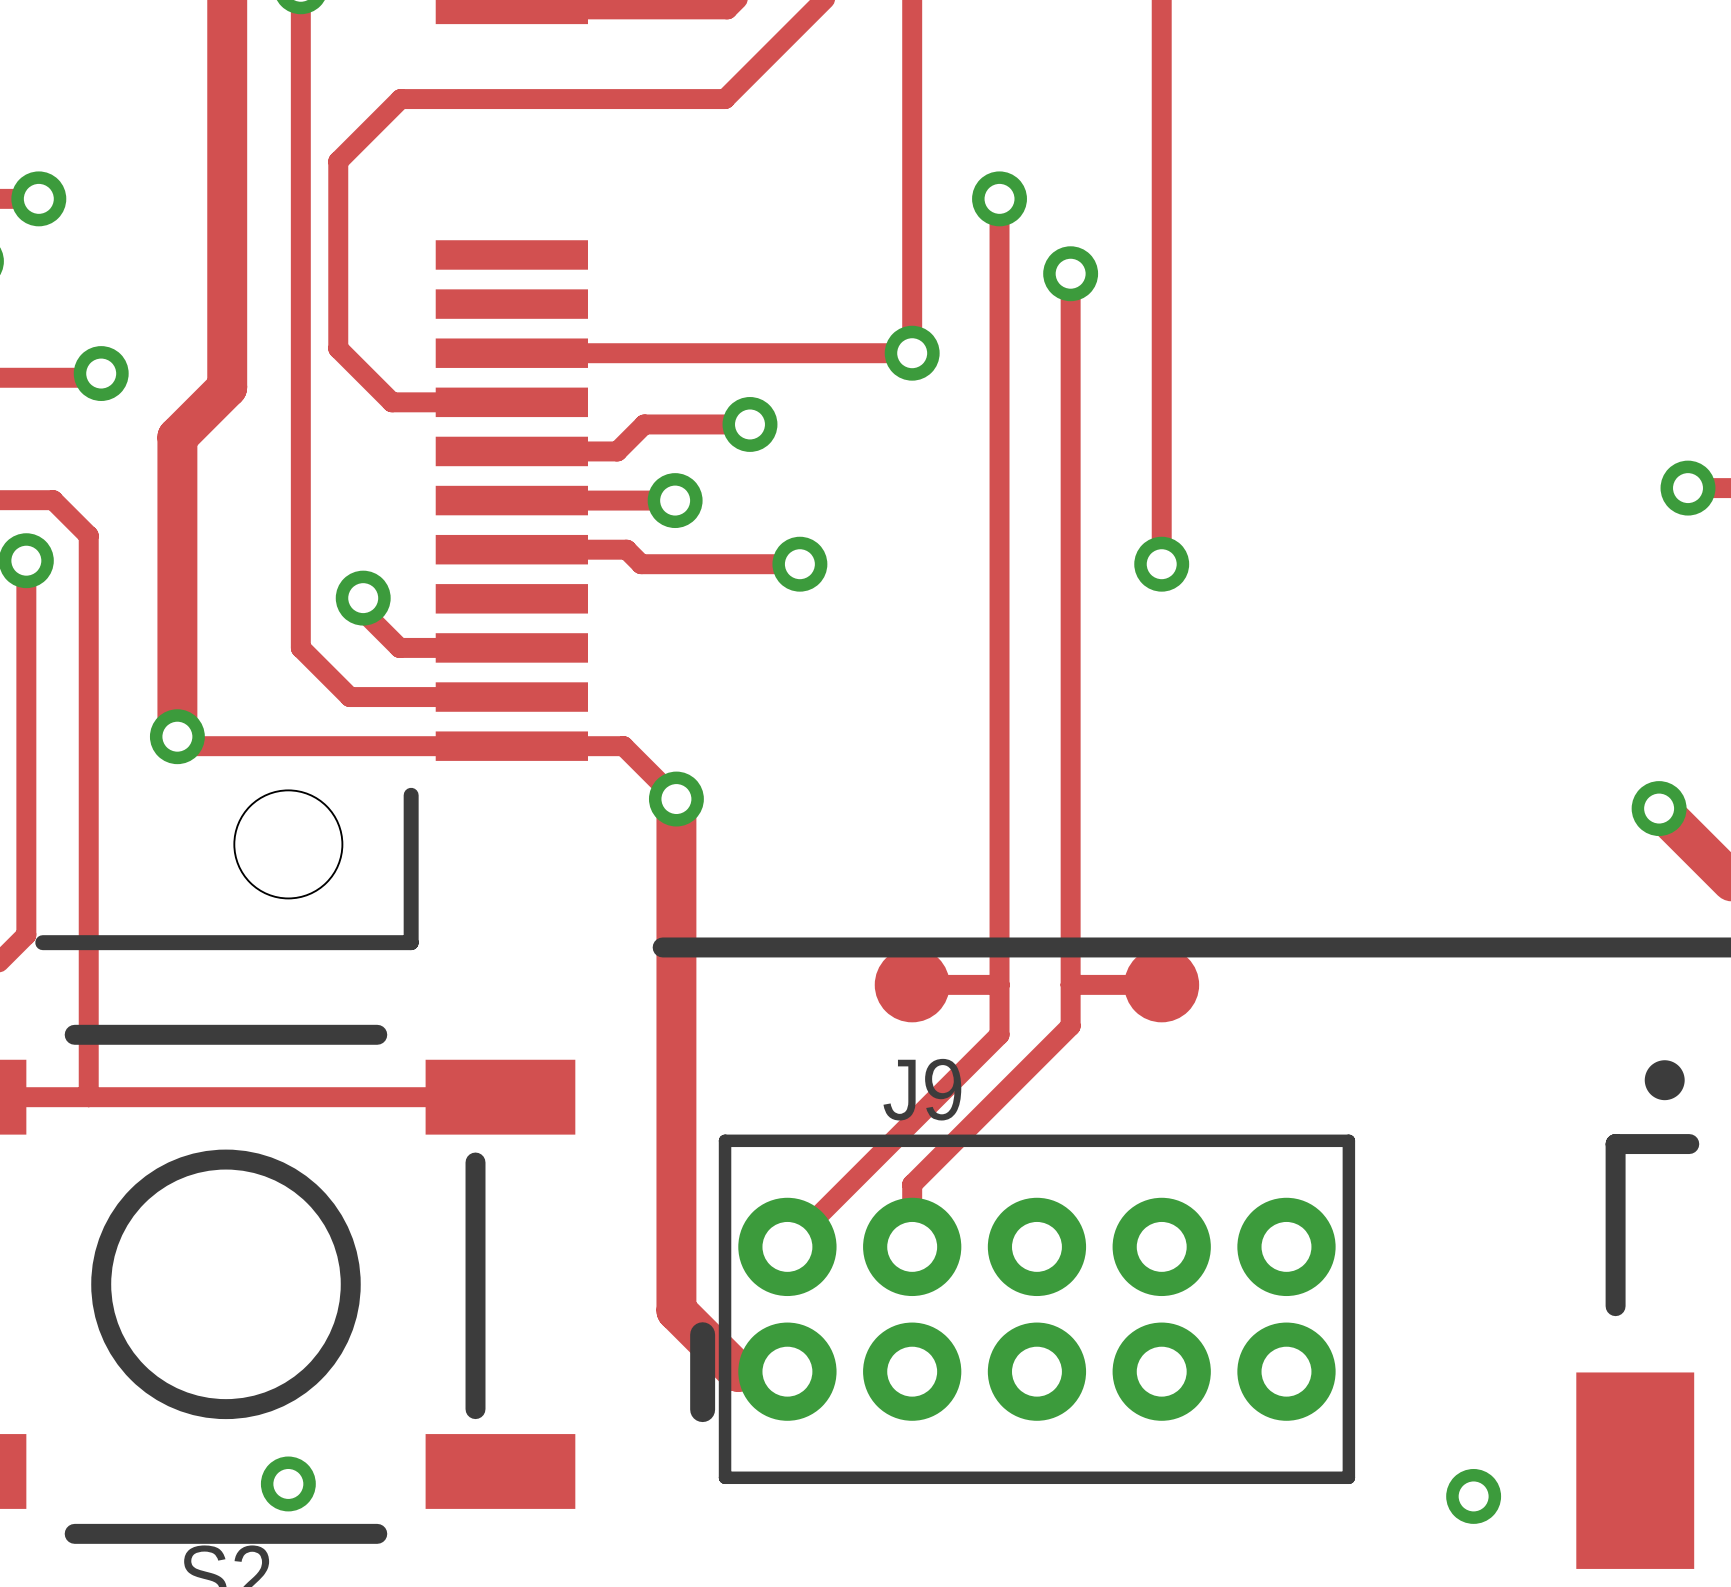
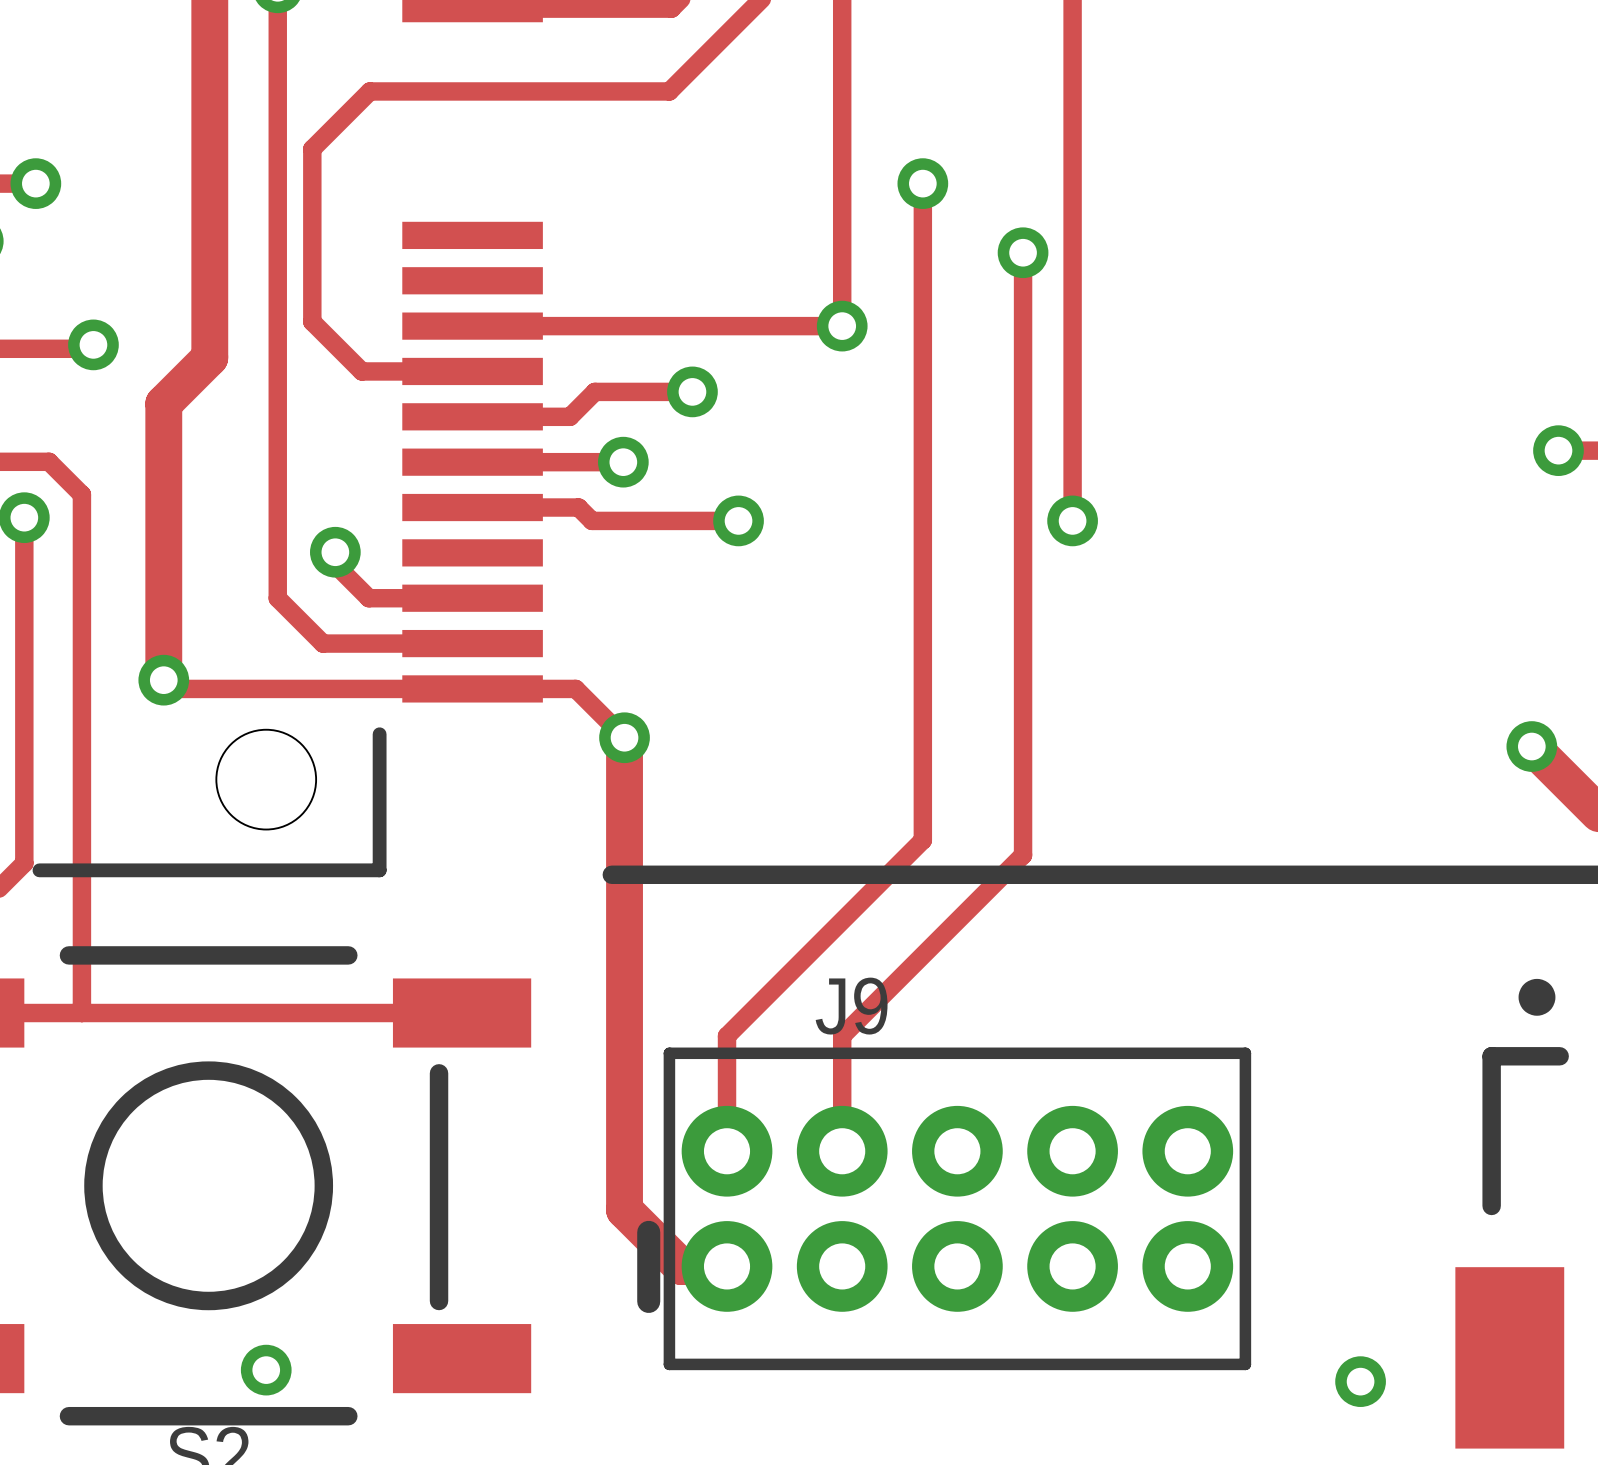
track: (1070, 273) (1070, 1026) (912, 1184) -> none
via position: (1070, 273) -> (1023, 252)
track: none -> (1023, 252) (1023, 855) (922, 955)
track: (999, 910) (999, 1034) -> (922, 840) (727, 1036) (727, 1151)
track: (912, 984) (999, 984) -> none
part: (912, 984) -> none
track: (1070, 984) (1161, 984) -> none
part: (1161, 984) -> none
track: (912, 1122) (787, 1246) -> (842, 1036) (842, 1093)

